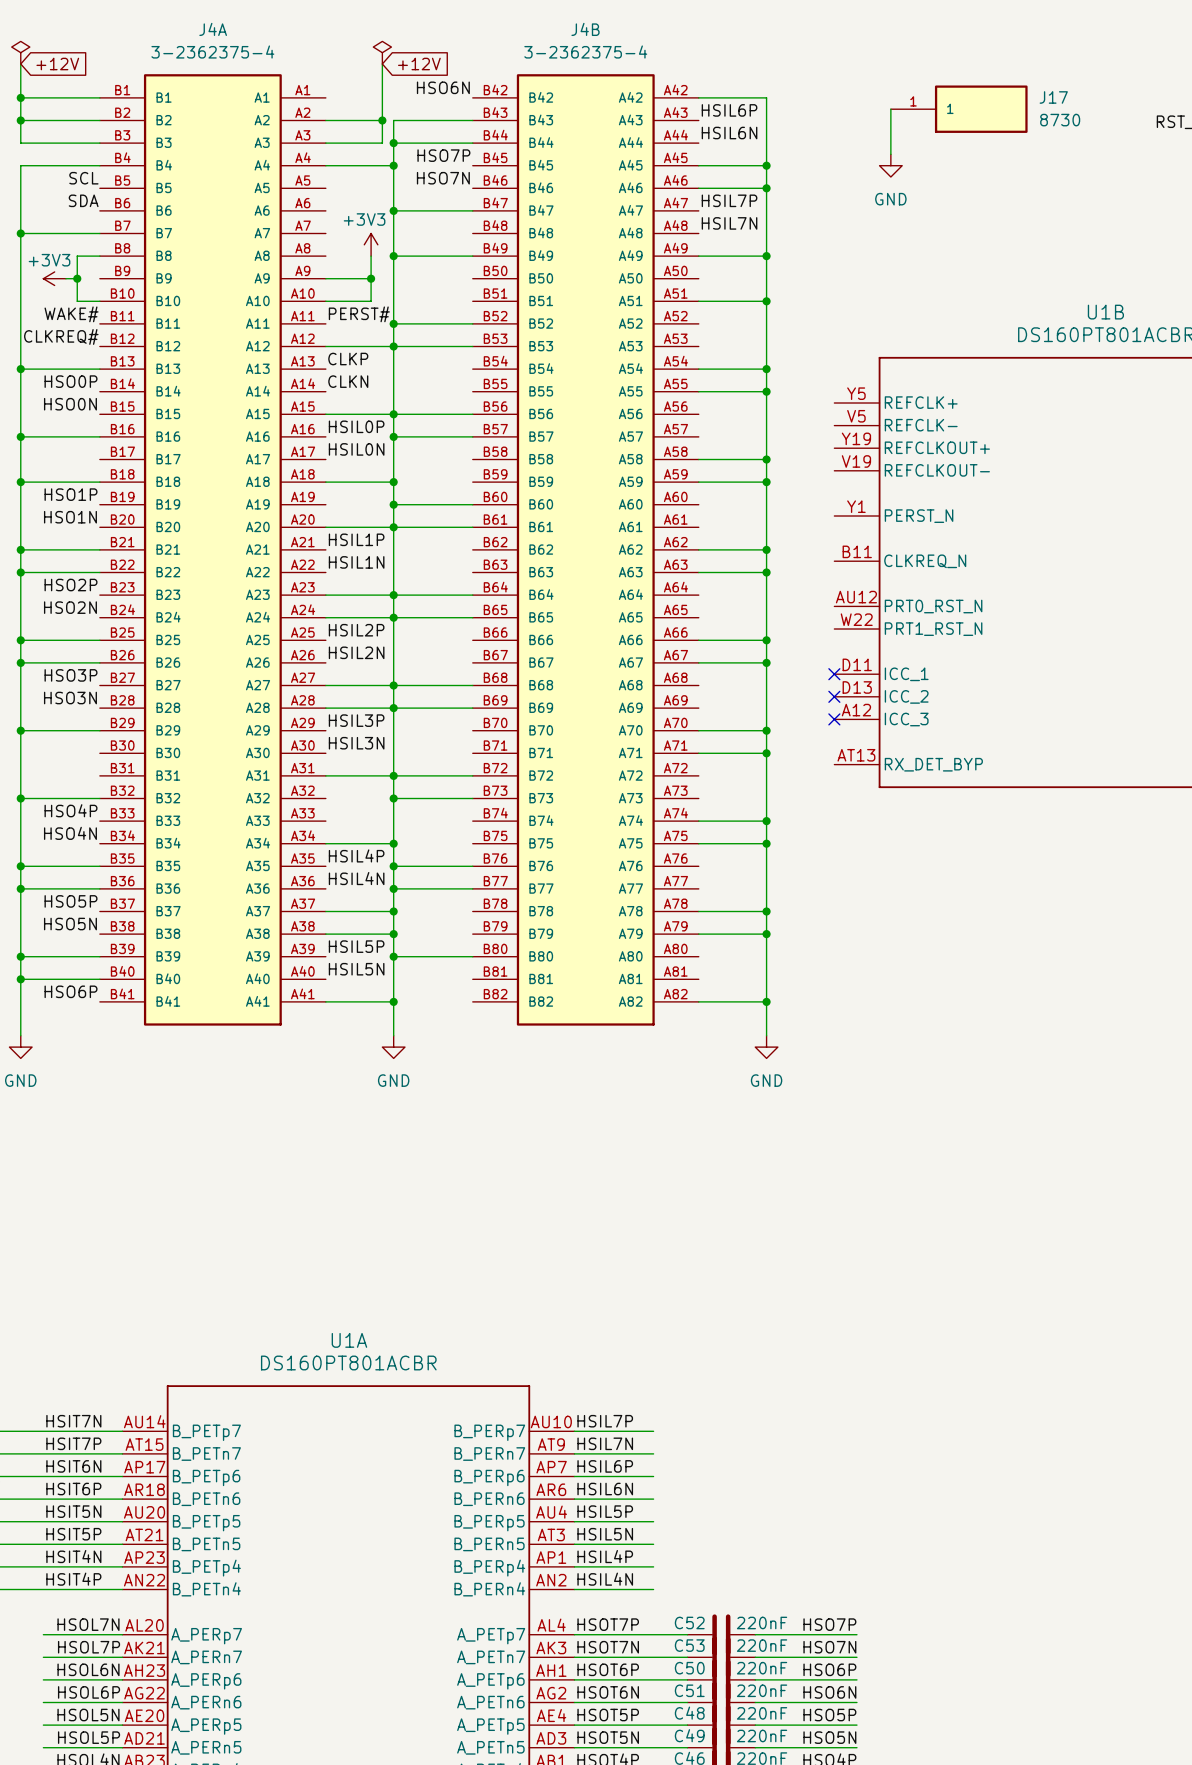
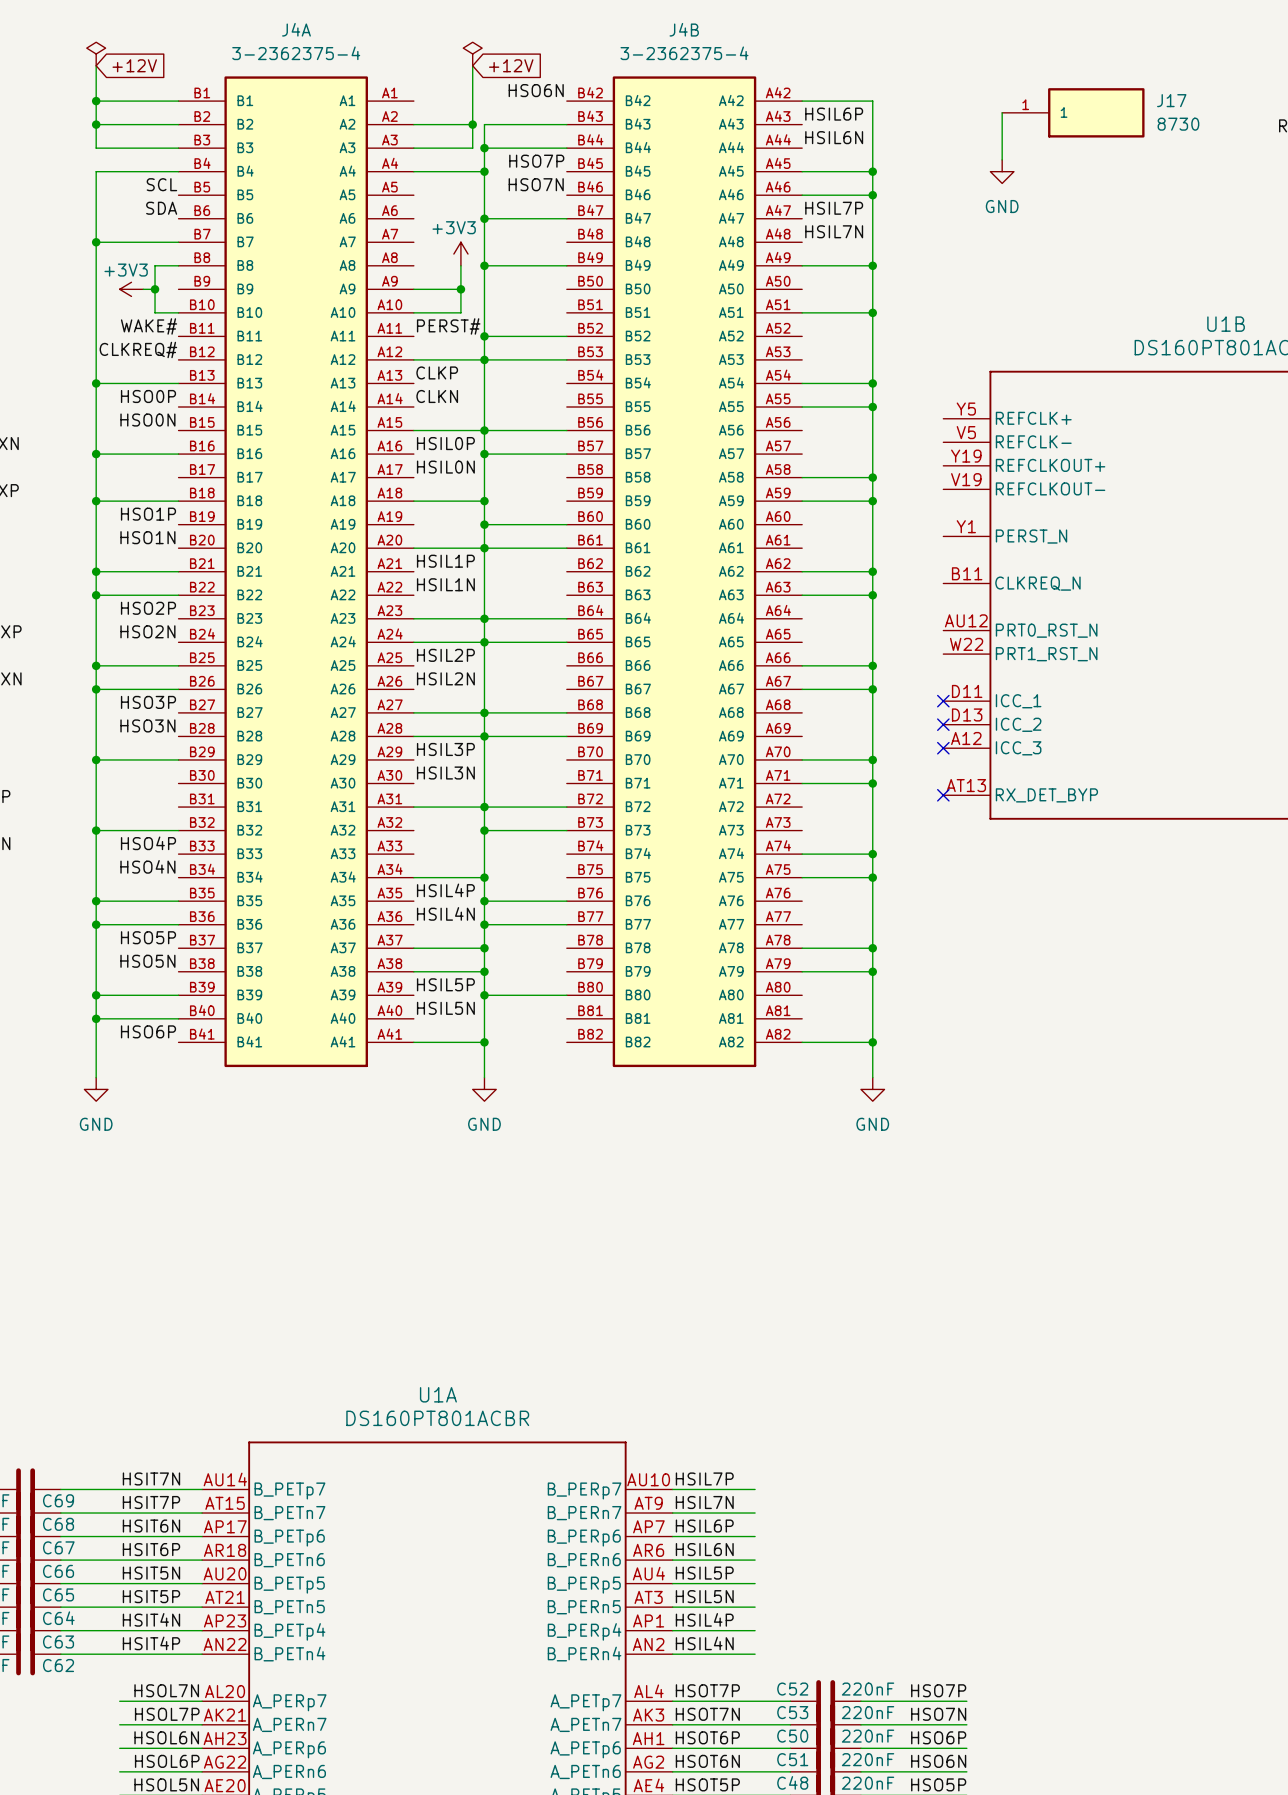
no-connect mark: none -> (943, 795)

